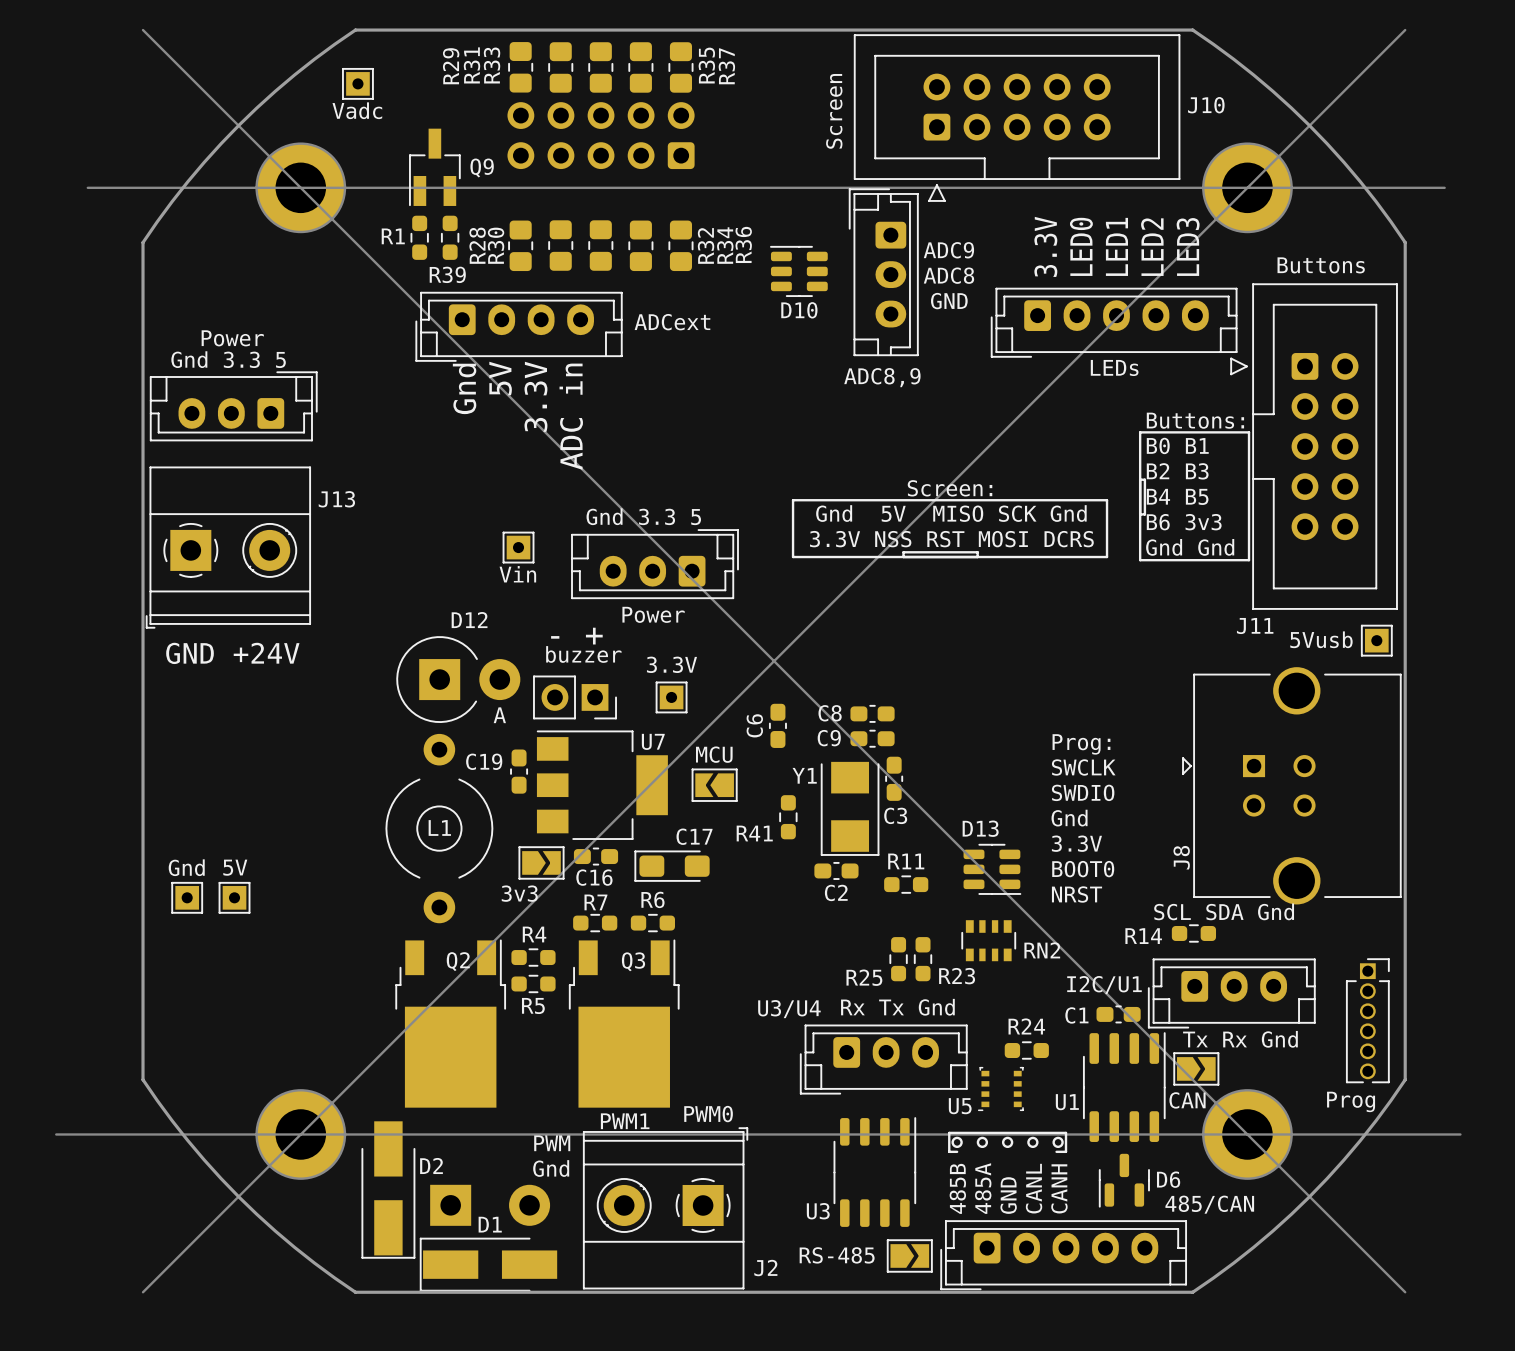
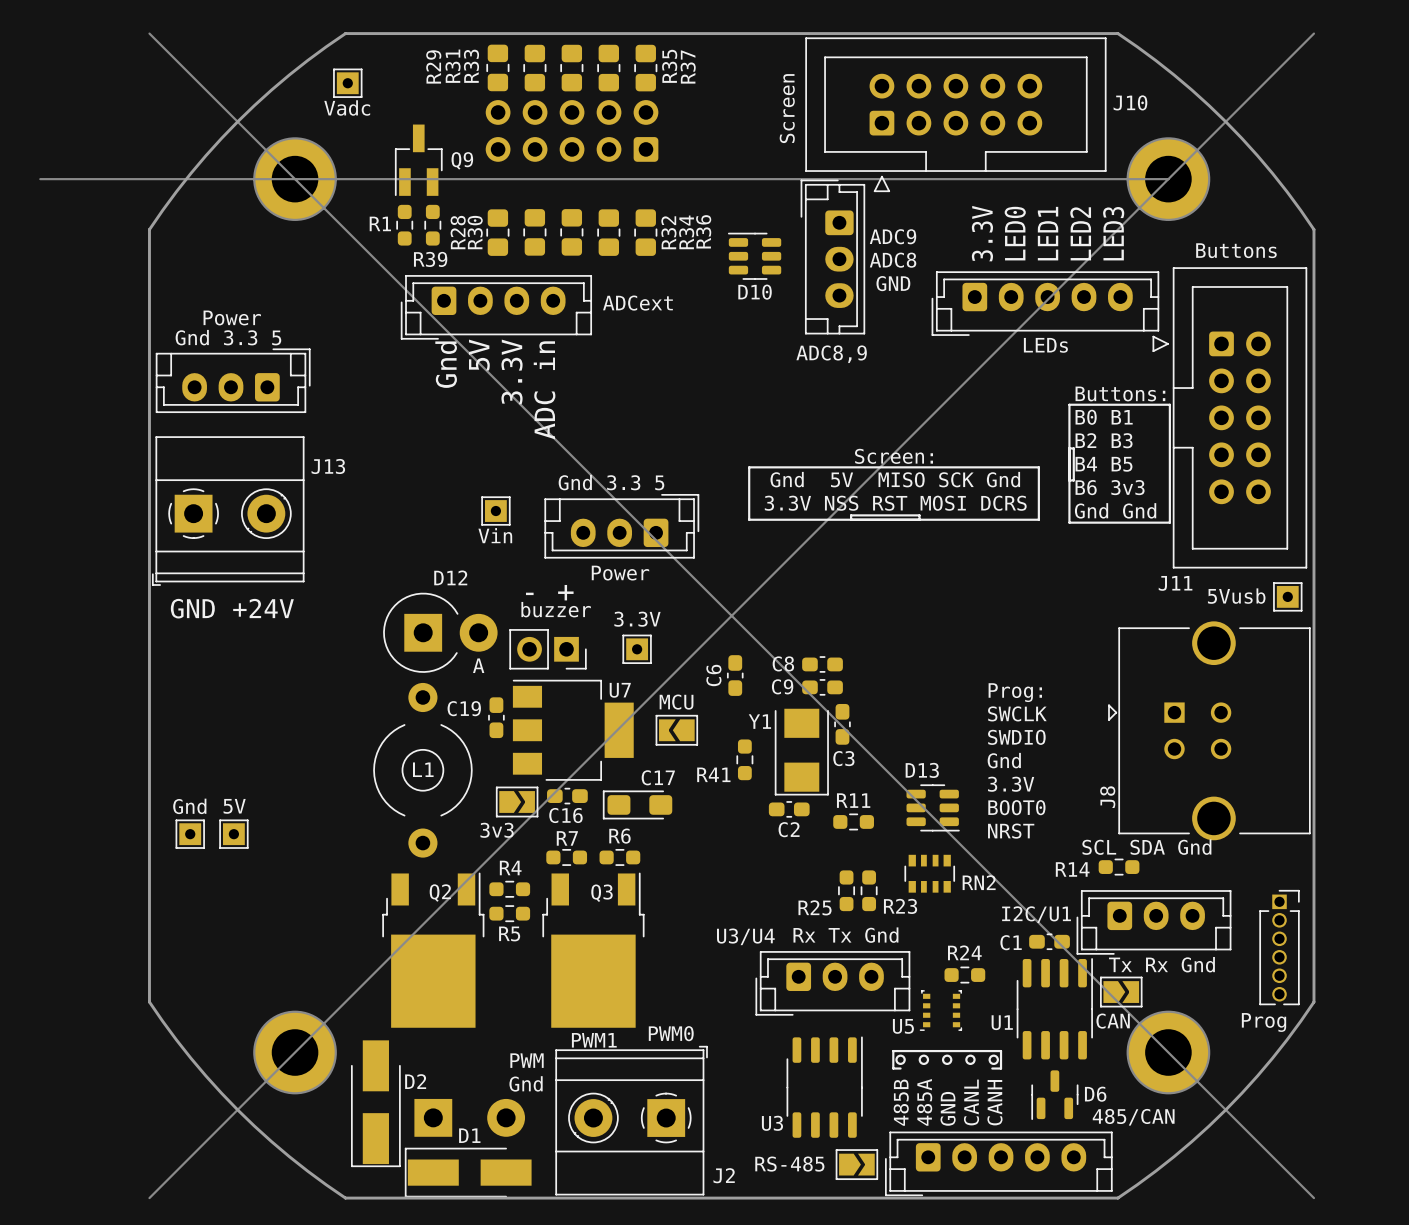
line: none -> (40, 179) (98, 179)
line: (1247, 187) (1444, 187) -> none
line: (56, 1134) (1460, 1134) -> none

